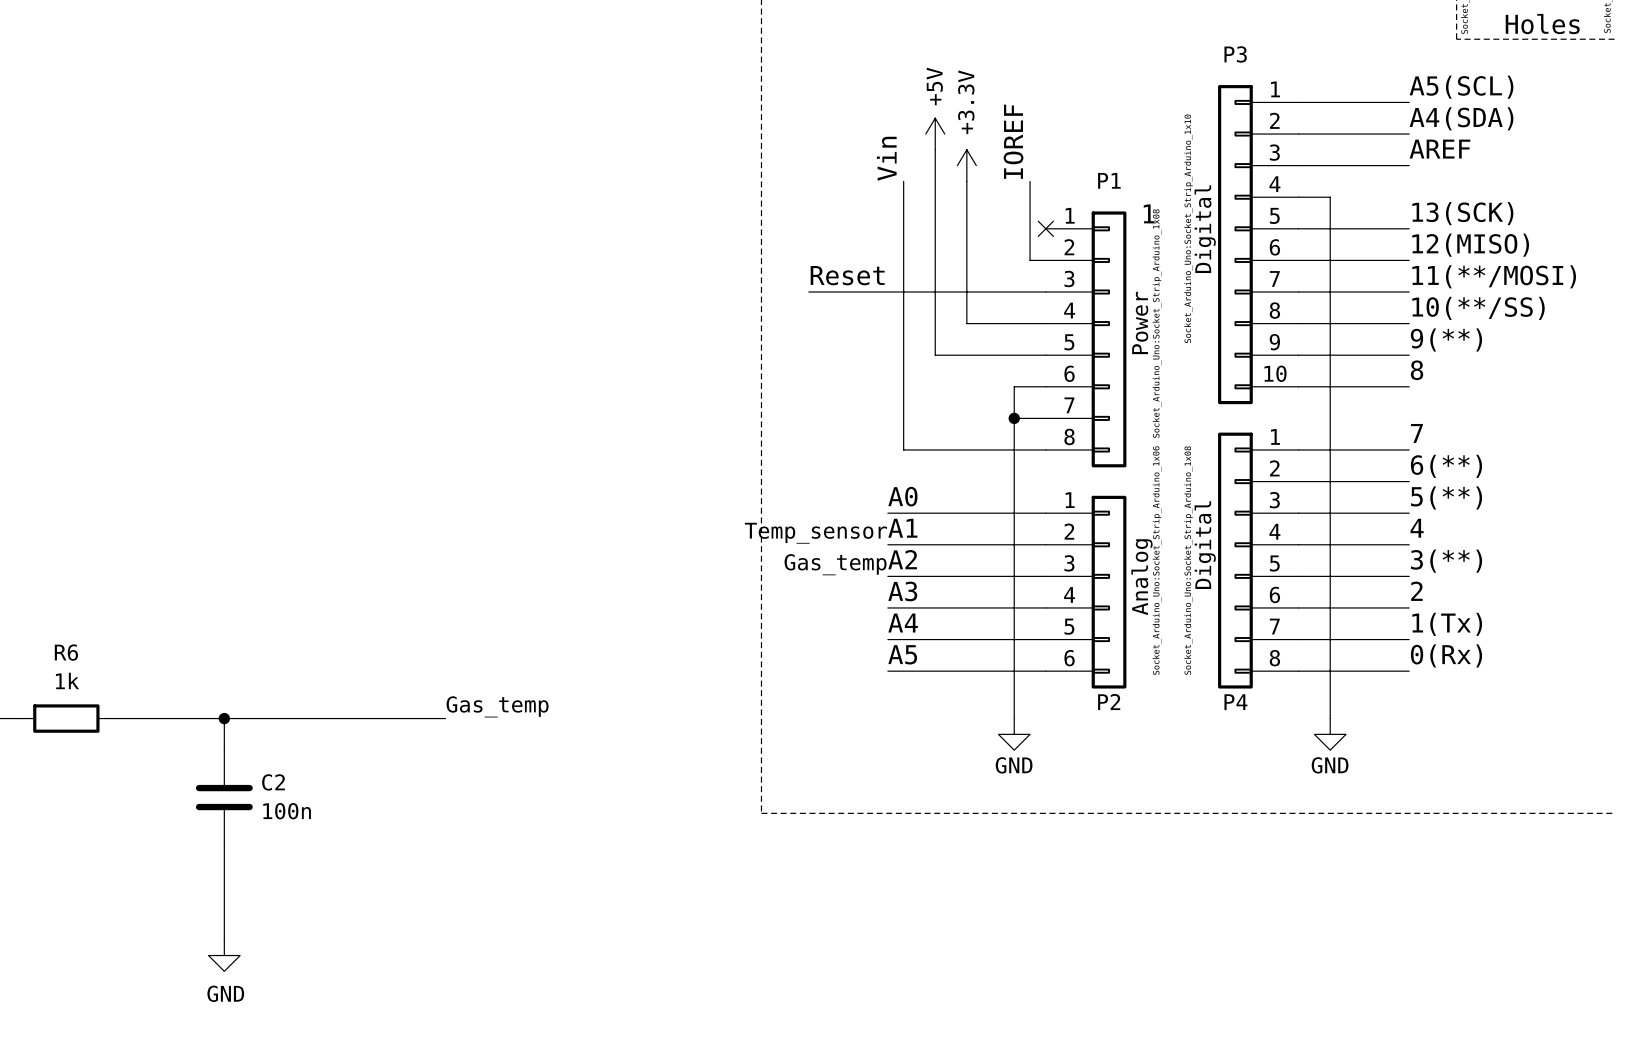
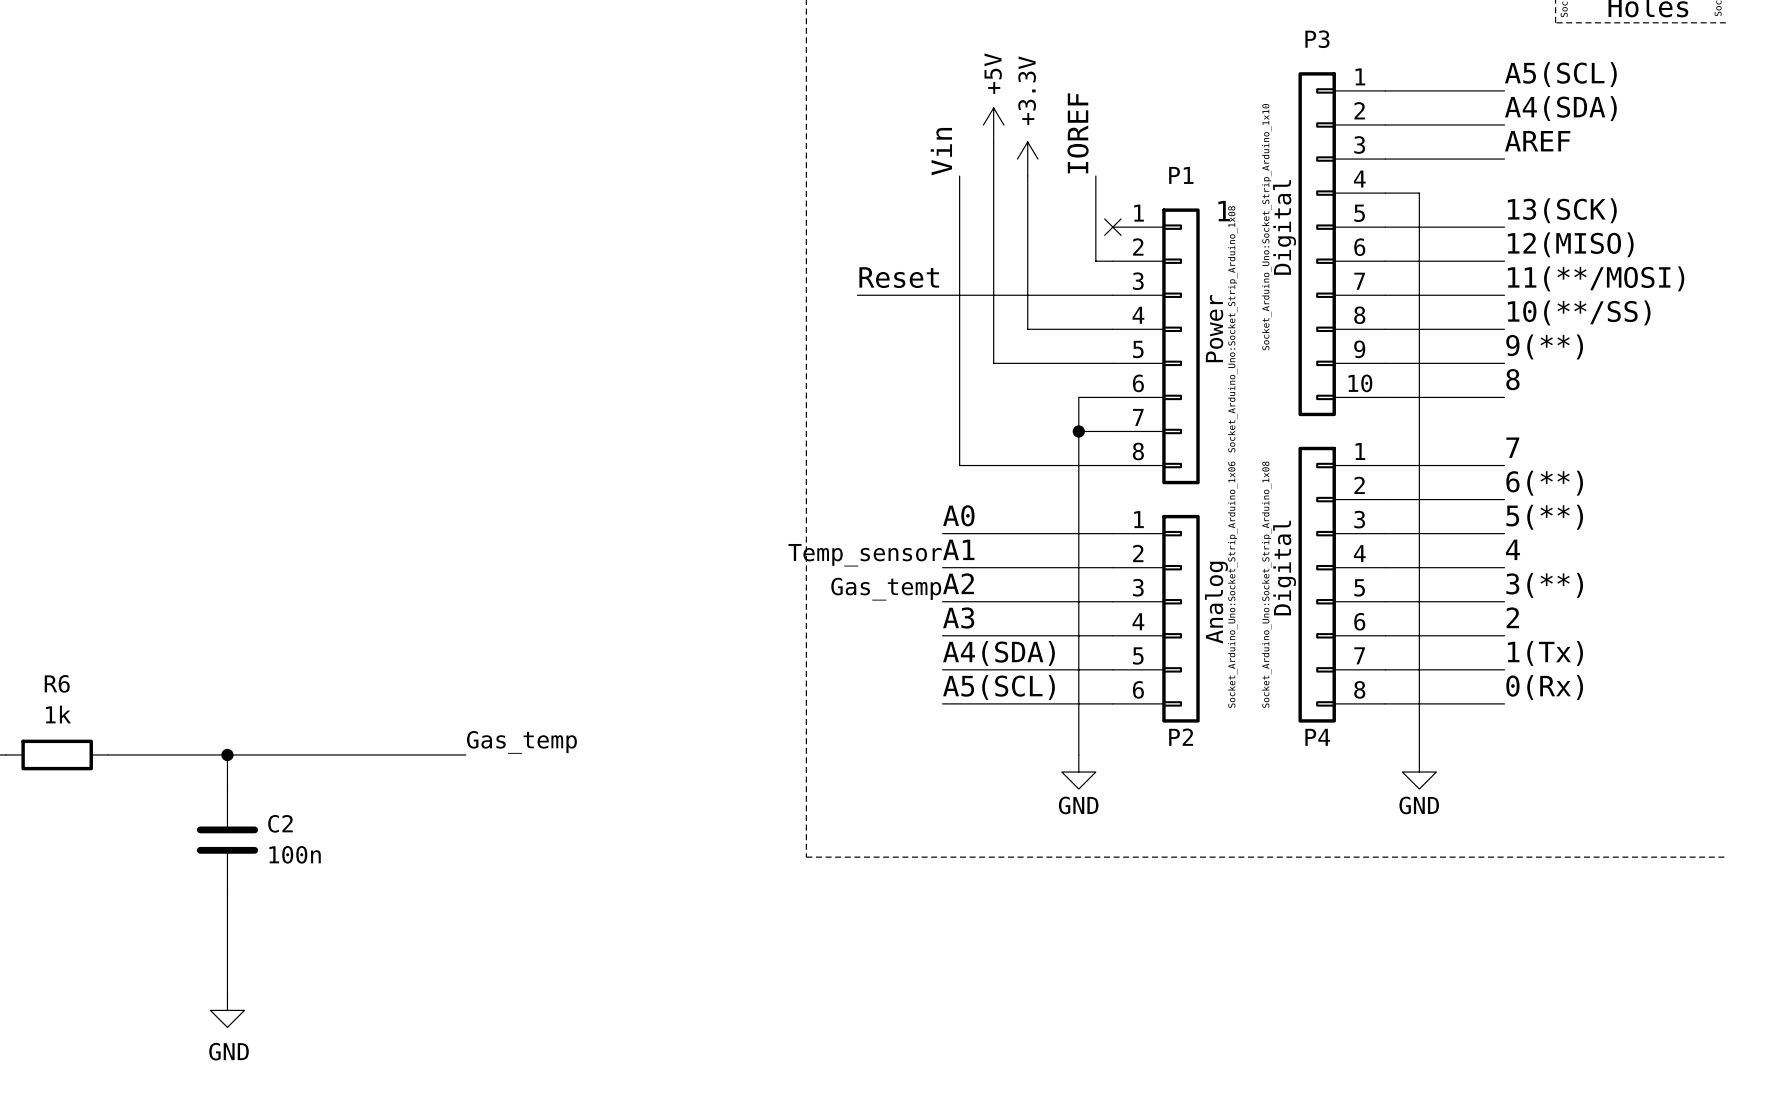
label: A4 (903, 623) -> A4(SDA) (998, 653)
label: A5 (902, 654) -> A5(SCL) (998, 687)

